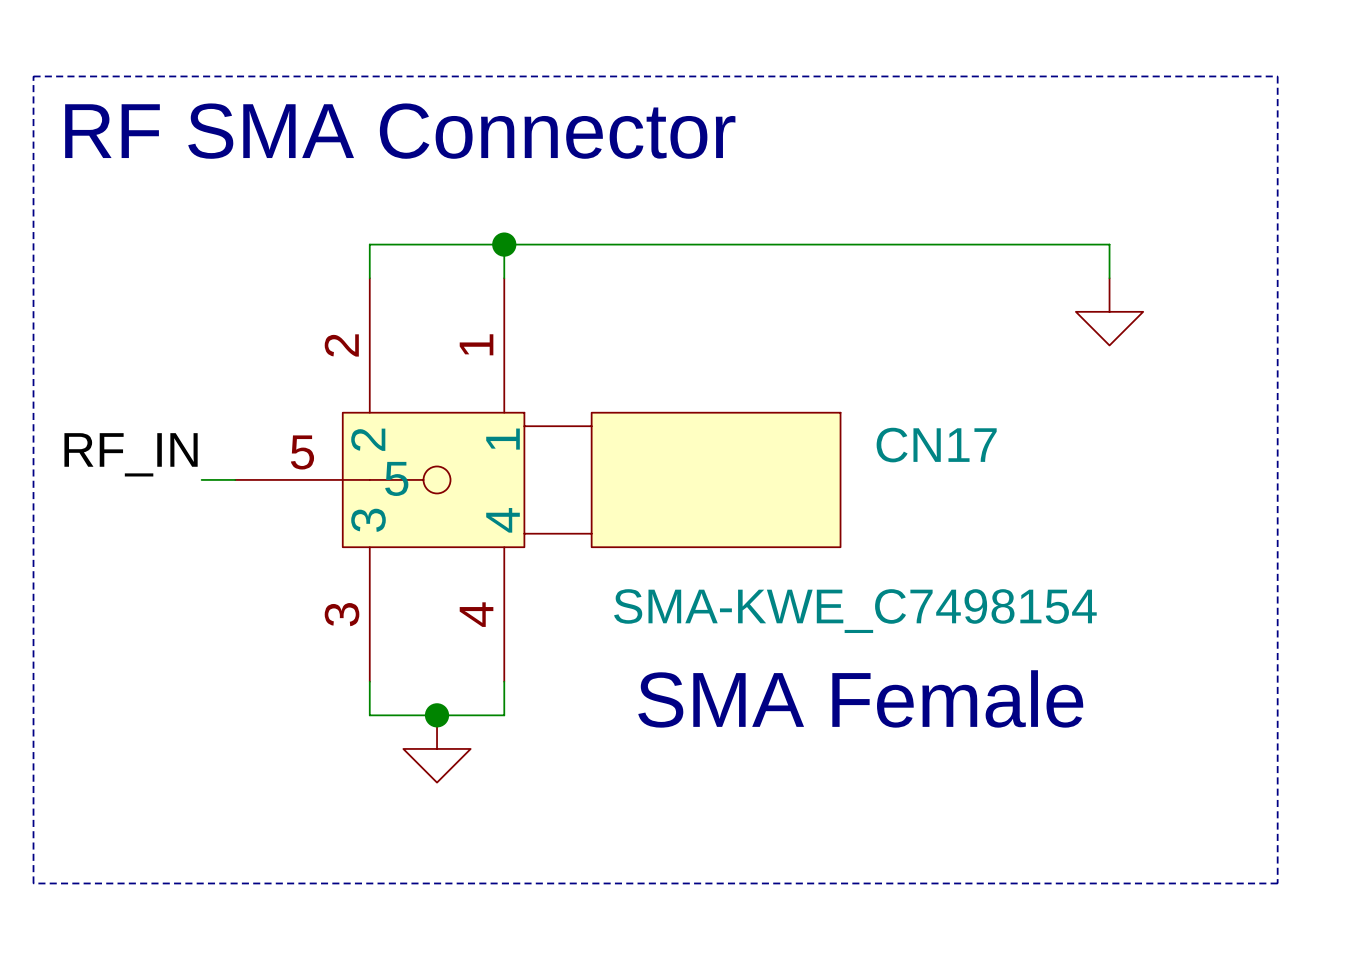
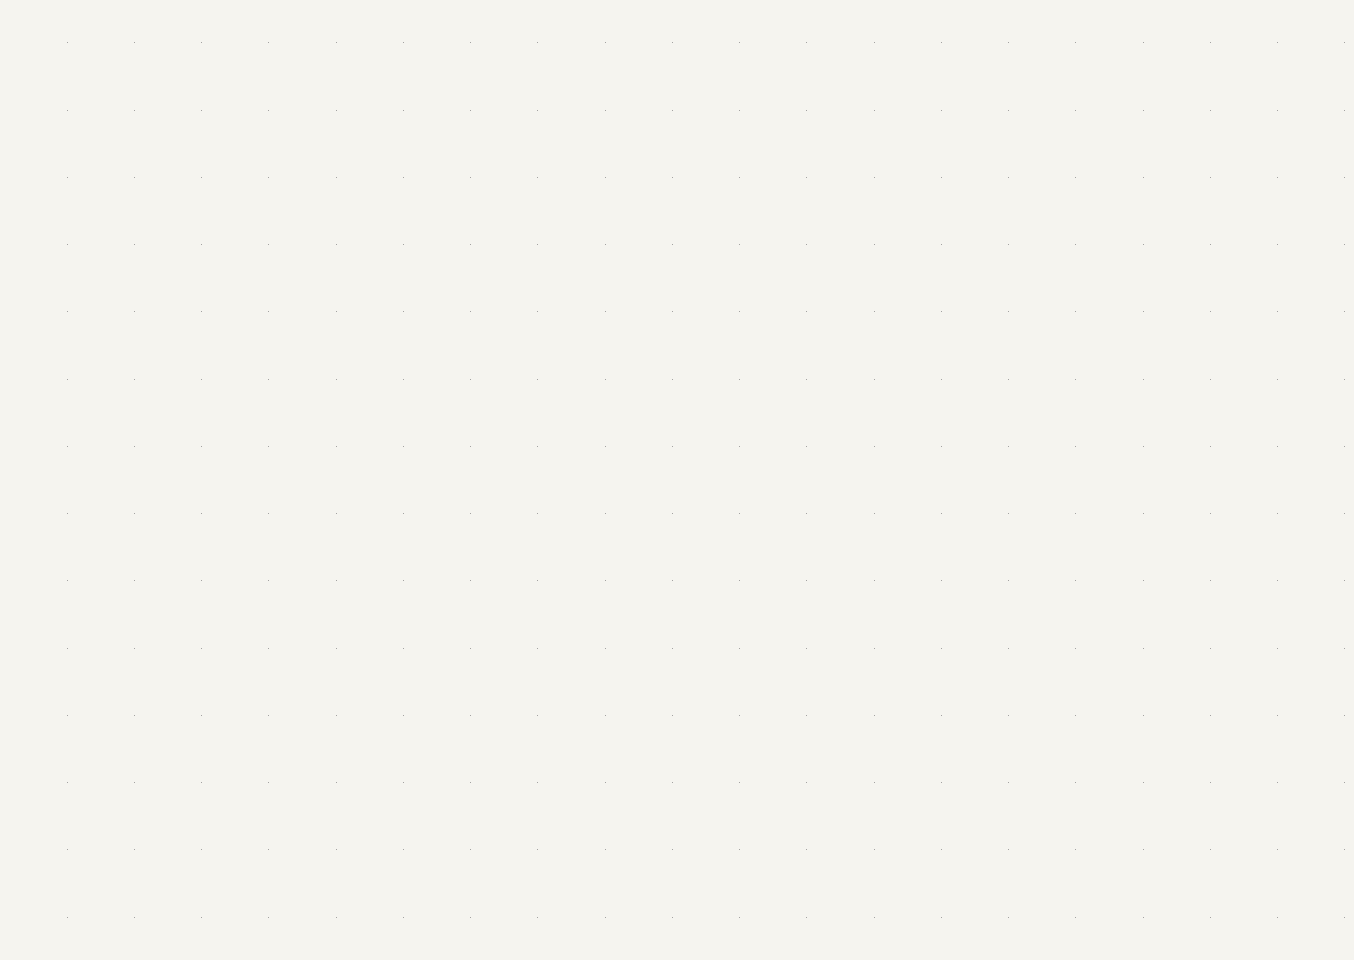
line: (33, 76) (1277, 76) (1277, 883) (33, 883) (33, 76) -> none
text: RF SMA Connector (400, 131) -> none
wire: (504, 244) (504, 278) -> none
junction: (504, 244) -> none
wire: (369, 278) (369, 244) (1109, 244) (1109, 278) -> none
power symbol: (1109, 311) -> none
label: RF_IN (131, 454) -> none
wire: (201, 479) (235, 479) -> none
CN17: SMA-KWE_C7498154 (537, 479) -> none
wire: (369, 681) (369, 715) (504, 715) (504, 681) -> none
text: SMA Female (860, 698) -> none
junction: (437, 715) -> none
power symbol: (437, 748) -> none

